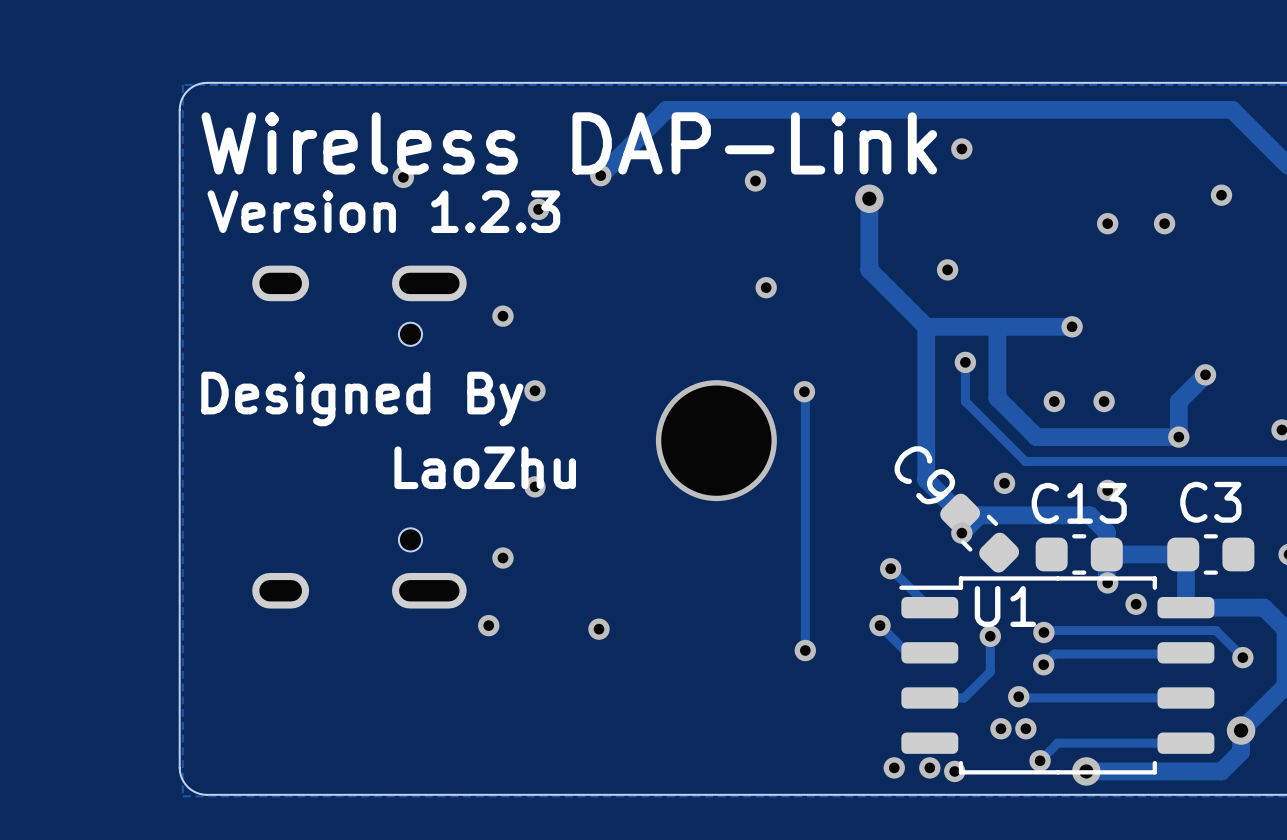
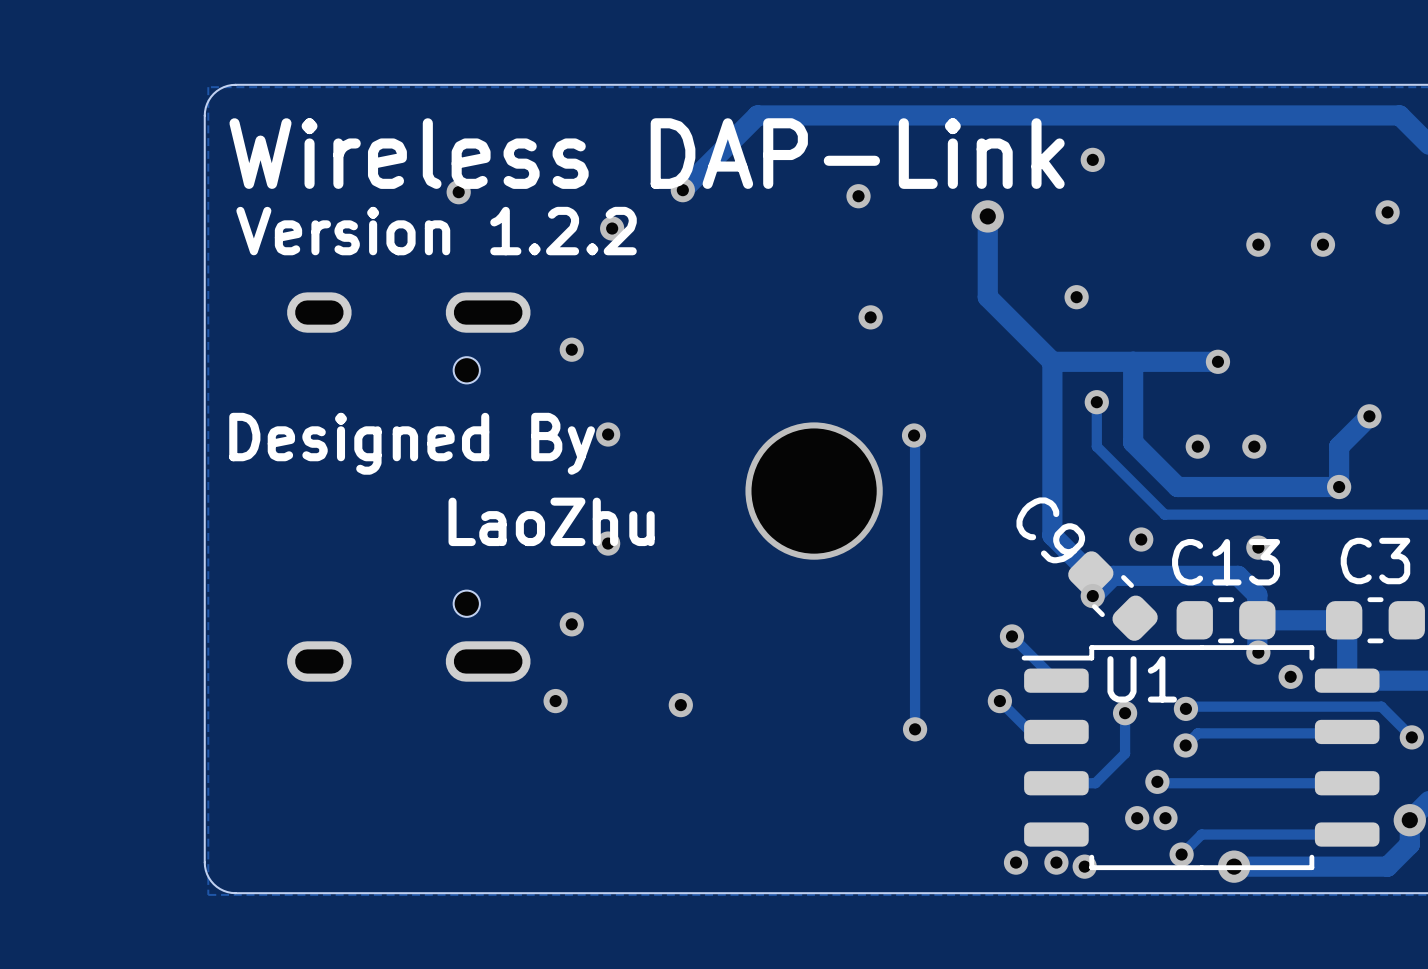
text: Version 1.2.3 (383, 211) -> Version 1.2.2 (436, 231)

